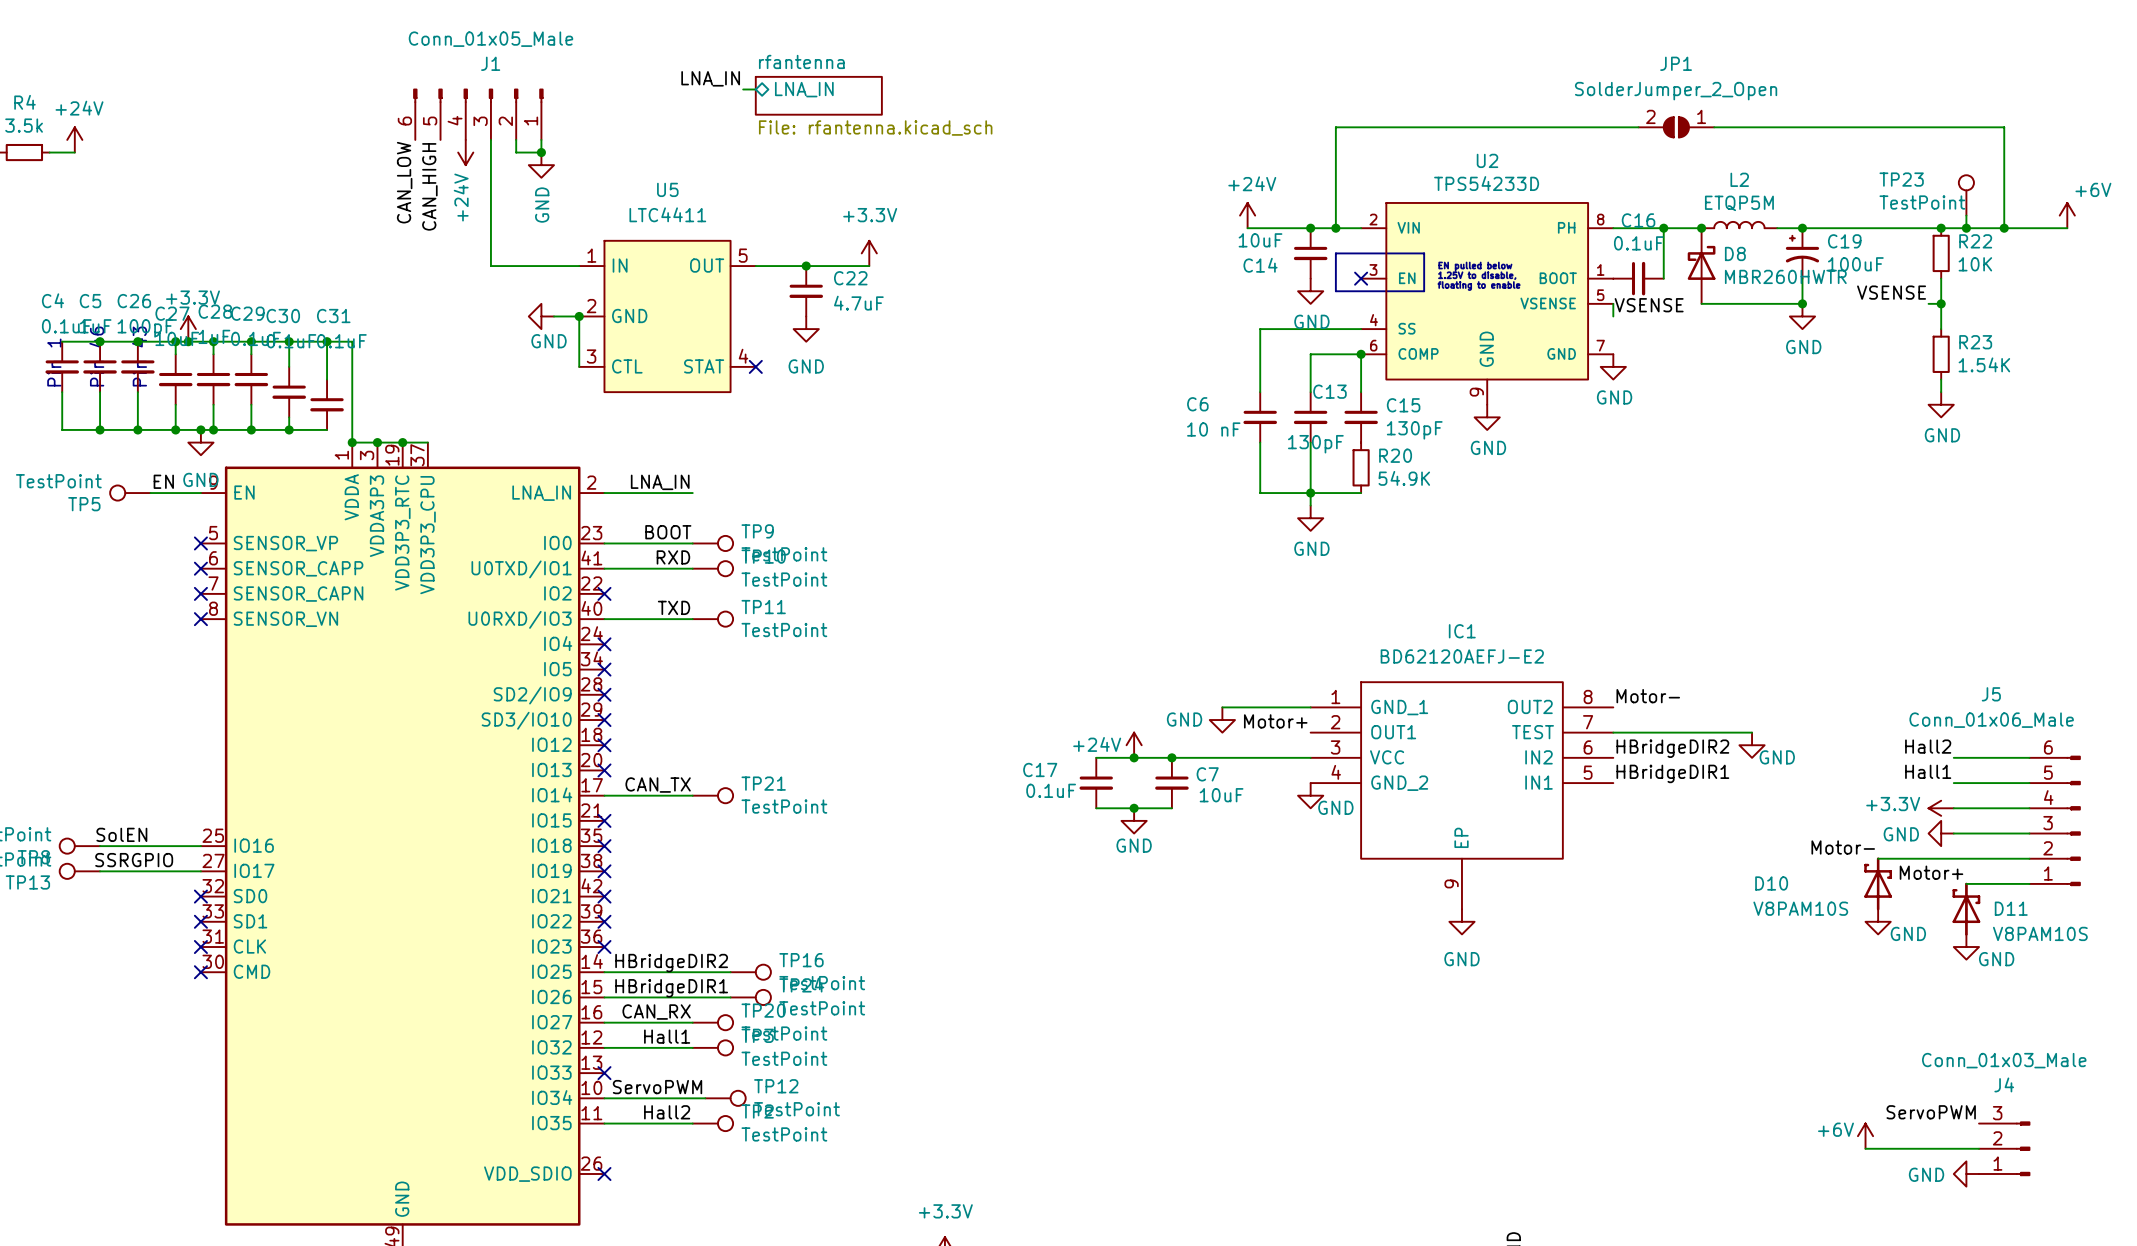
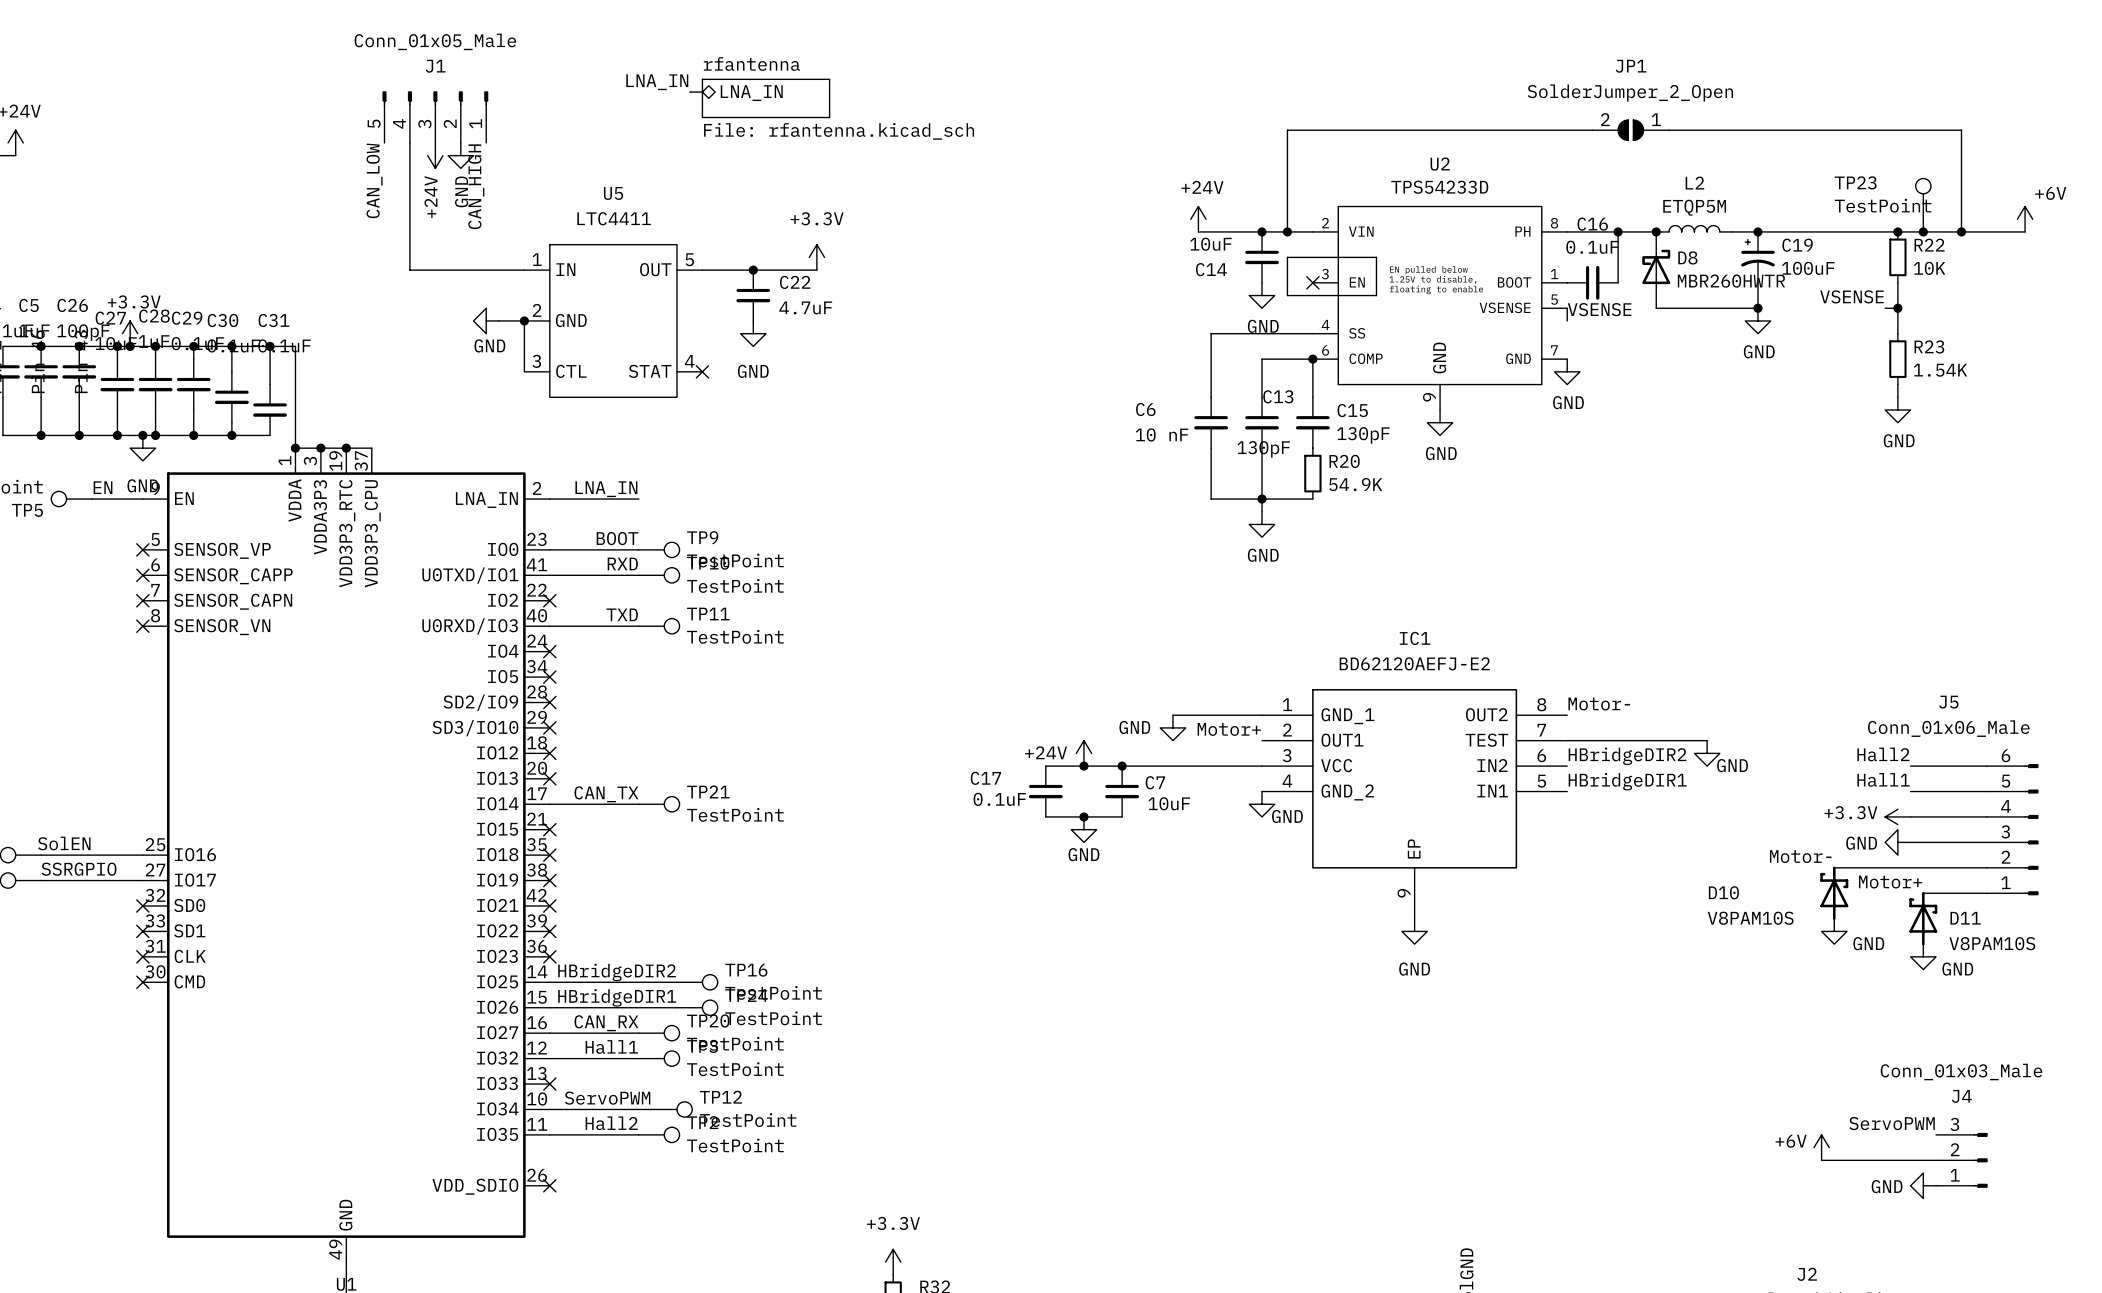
J1 symbol: [413, 88, 544, 140] -> [382, 91, 489, 143]
wire: (490, 139) (490, 266) -> (409, 142) (409, 270) (435, 270)
power symbol position: +24V (465, 152) -> +24V (435, 155)
junction: (541, 152) -> none
power symbol position: GND (541, 165) -> GND (460, 155)
label: CAN_LOW (404, 182) -> none
label: CAN_HIGH (429, 186) -> CAN_LOW (374, 180)
label: none -> CAN_HIGH (476, 186)

